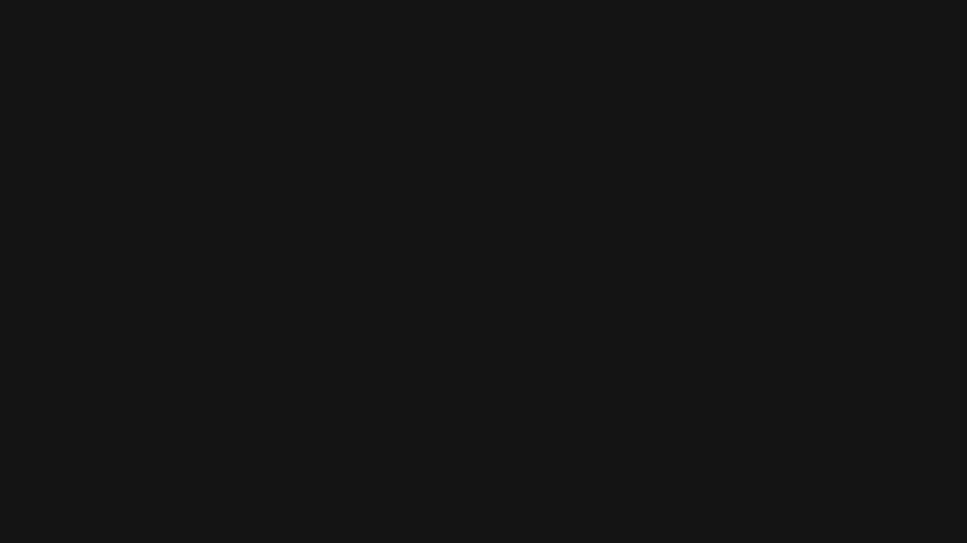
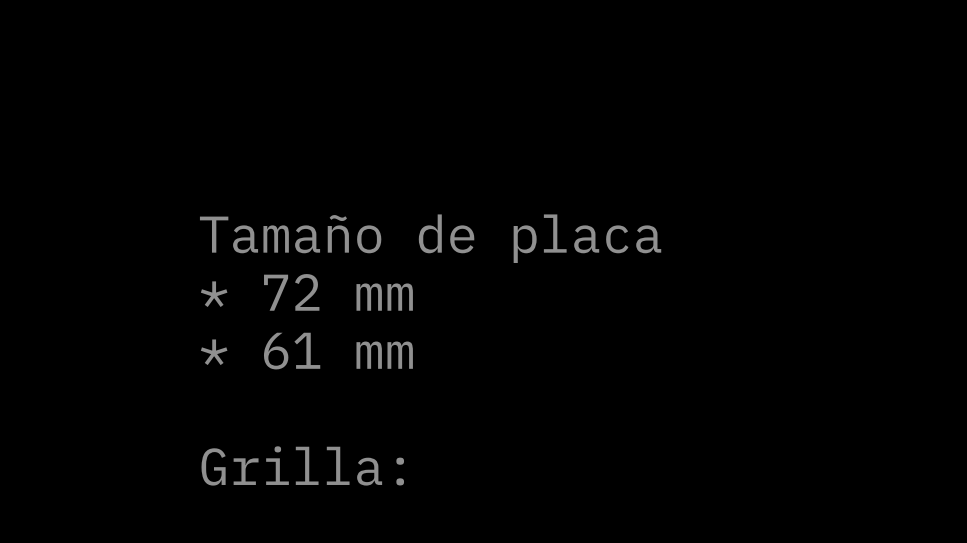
text: none -> Tamaño de placa (430, 238)
text: none -> * 72 mm (306, 292)
text: none -> * 61 mm (306, 351)
text: none -> Grilla: (302, 465)

